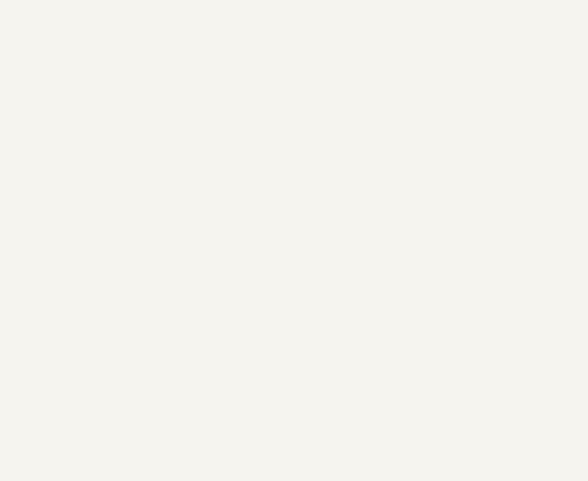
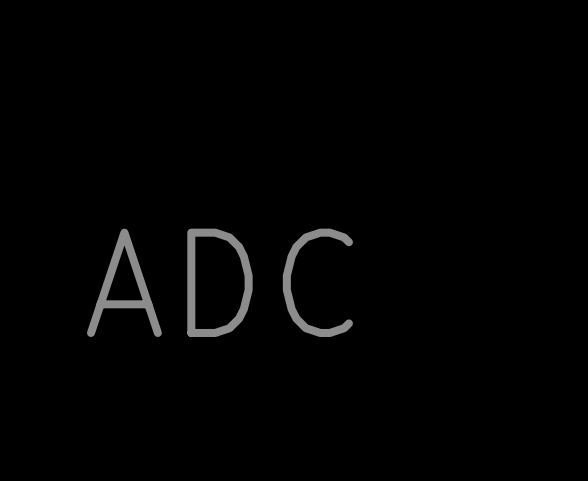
text: none -> ADC (219, 282)

